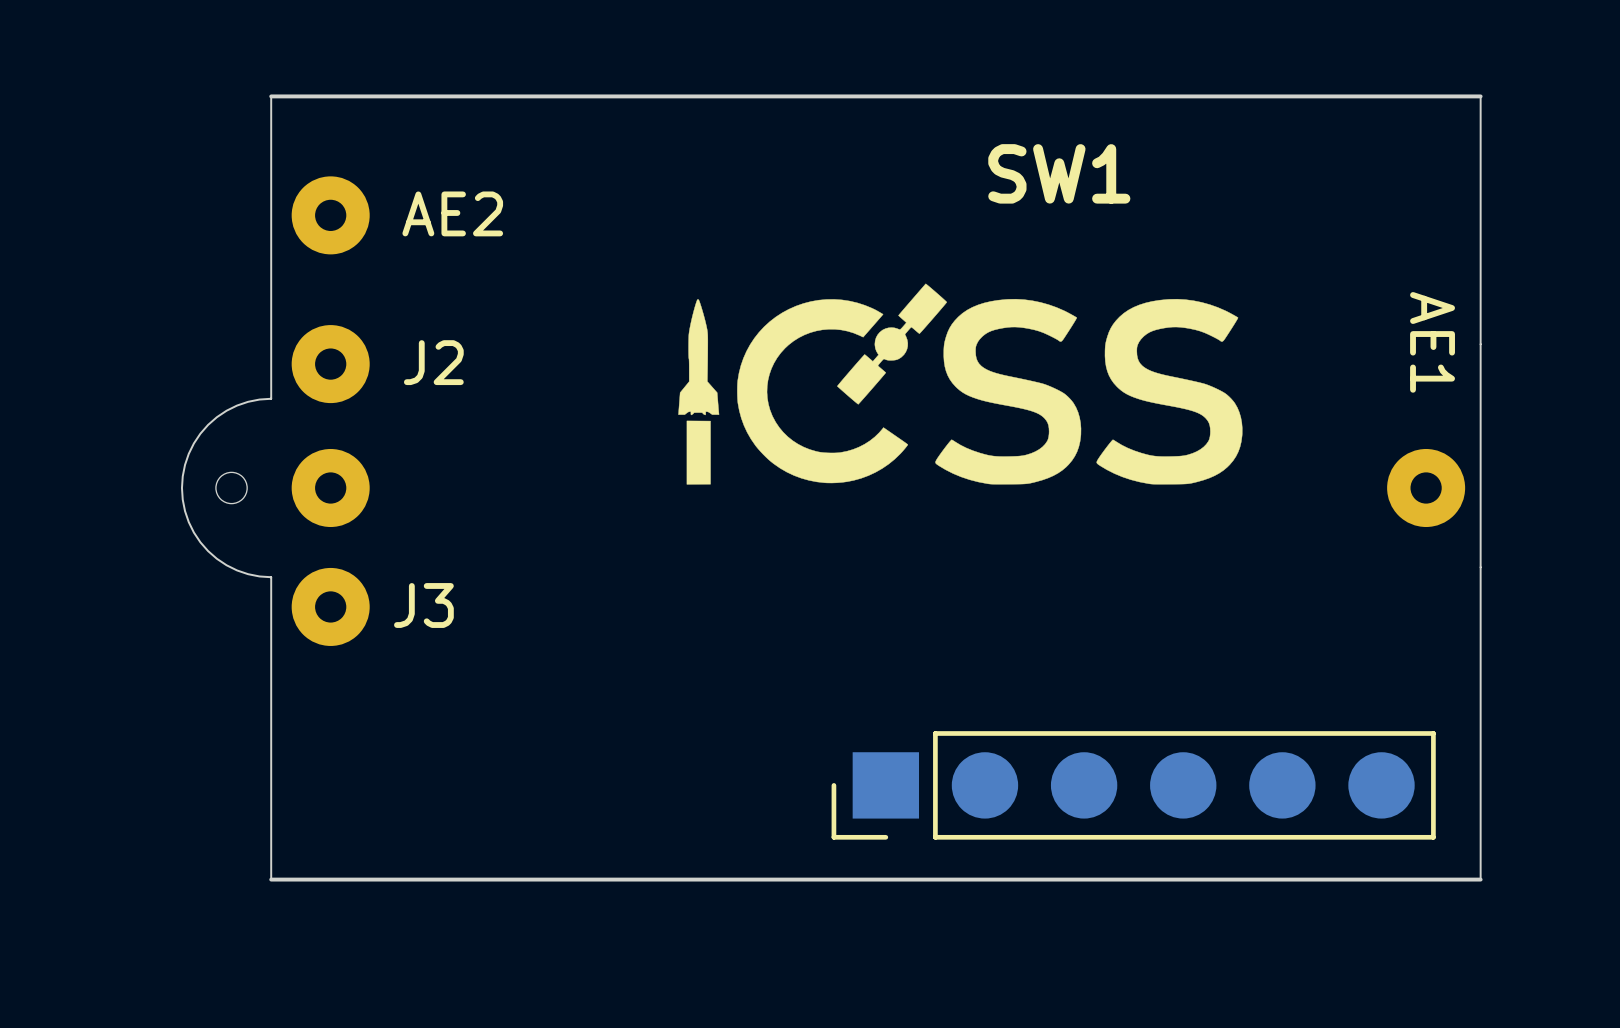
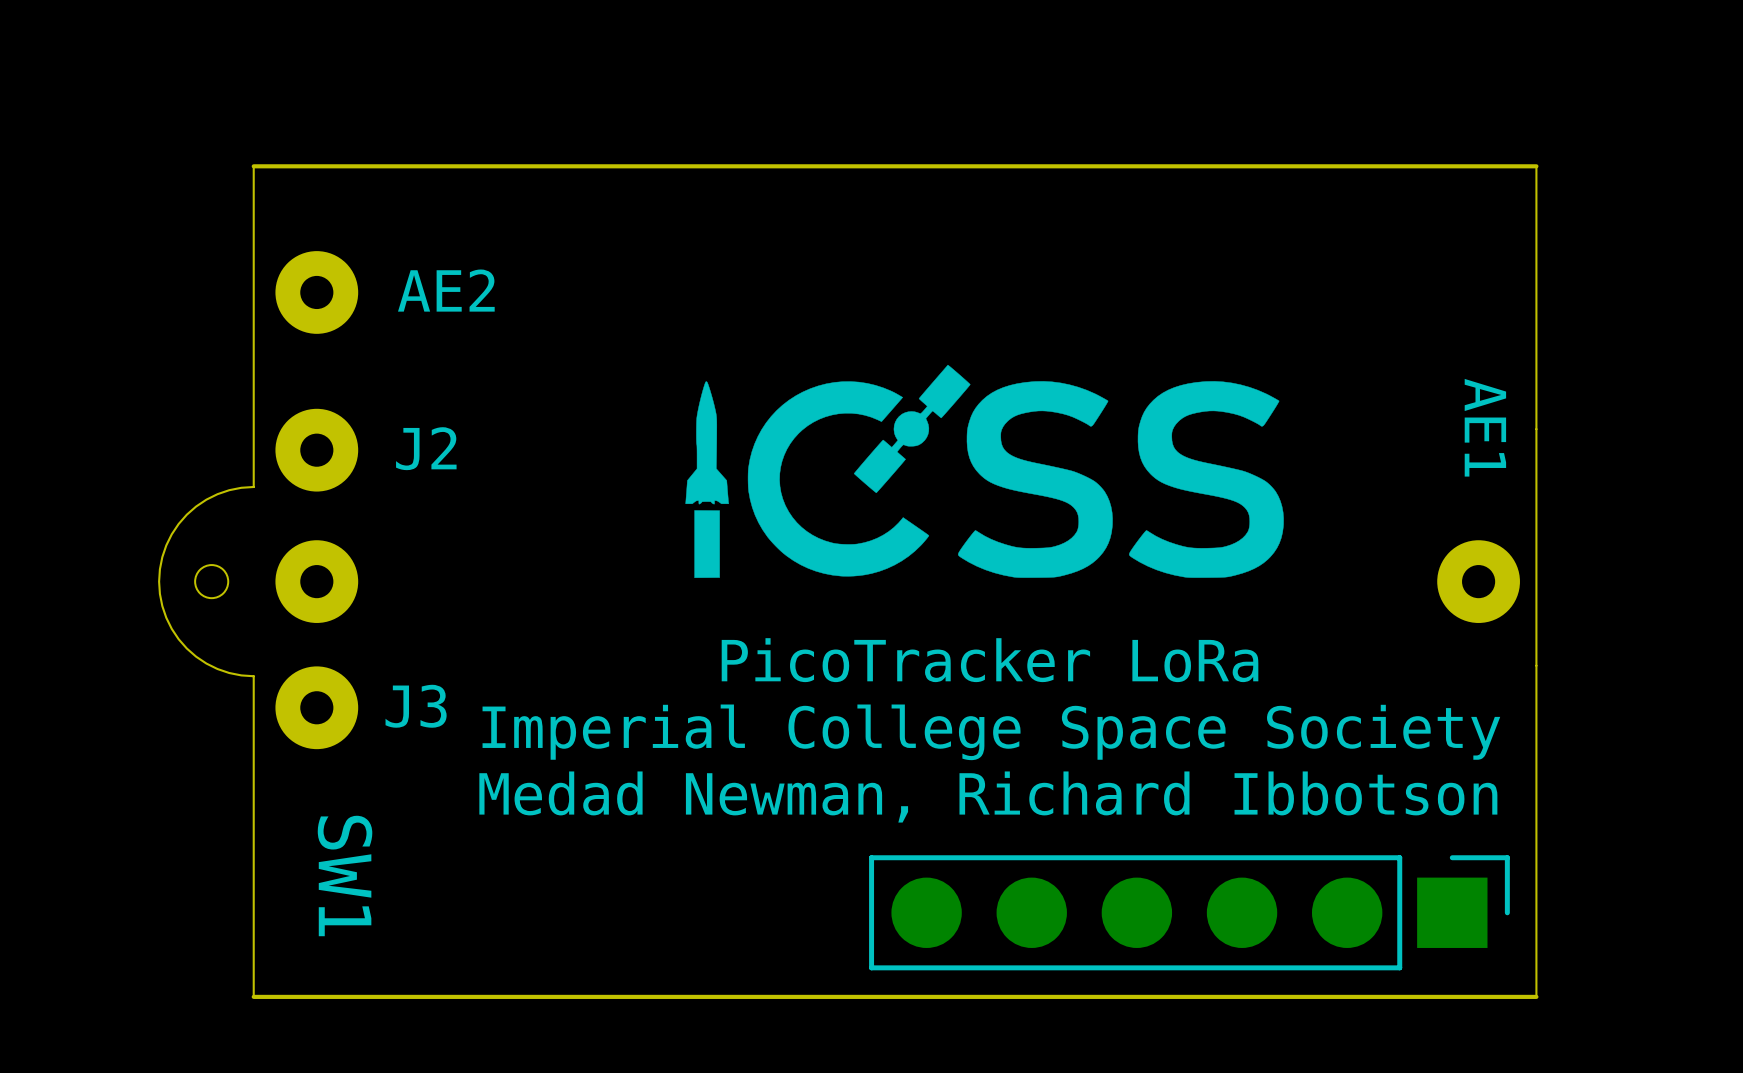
SW1 position: (1059, 173) -> (345, 875)
SW1 name rotation: 0° (1059, 173) -> 90° clockwise (345, 875)
text: none -> PicoTracker LoRa (990, 660)
text: none -> Imperial College Space Society (991, 732)
text: none -> Medad Newman, Richard Ibbotson (988, 797)
part rotation: 0° (1133, 785) -> 180° (1189, 912)

